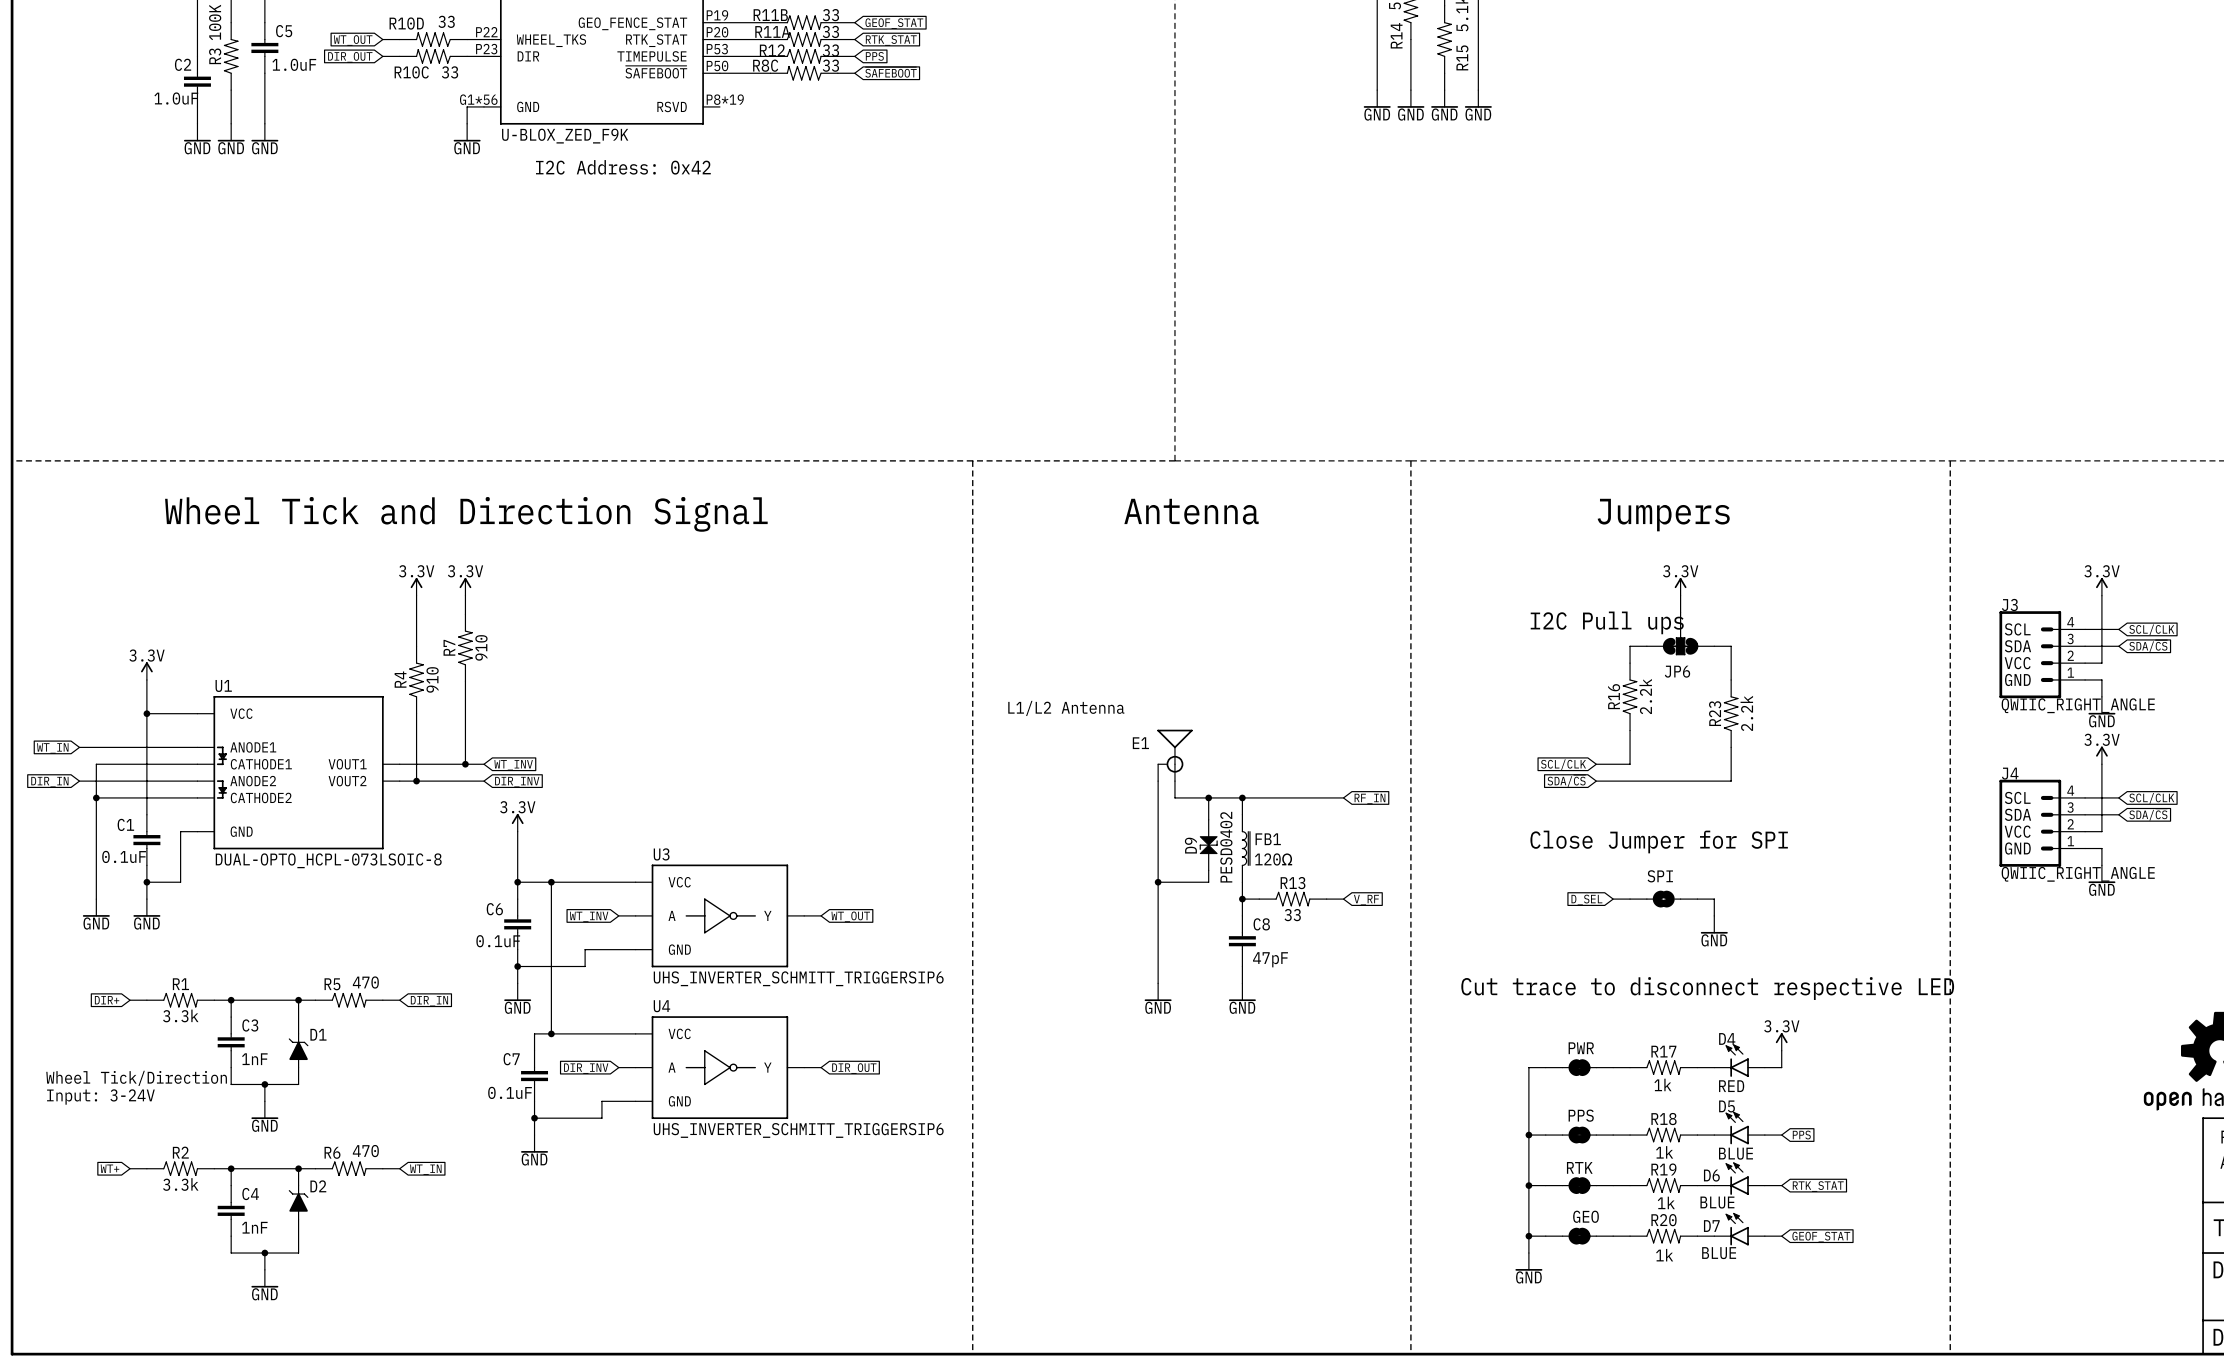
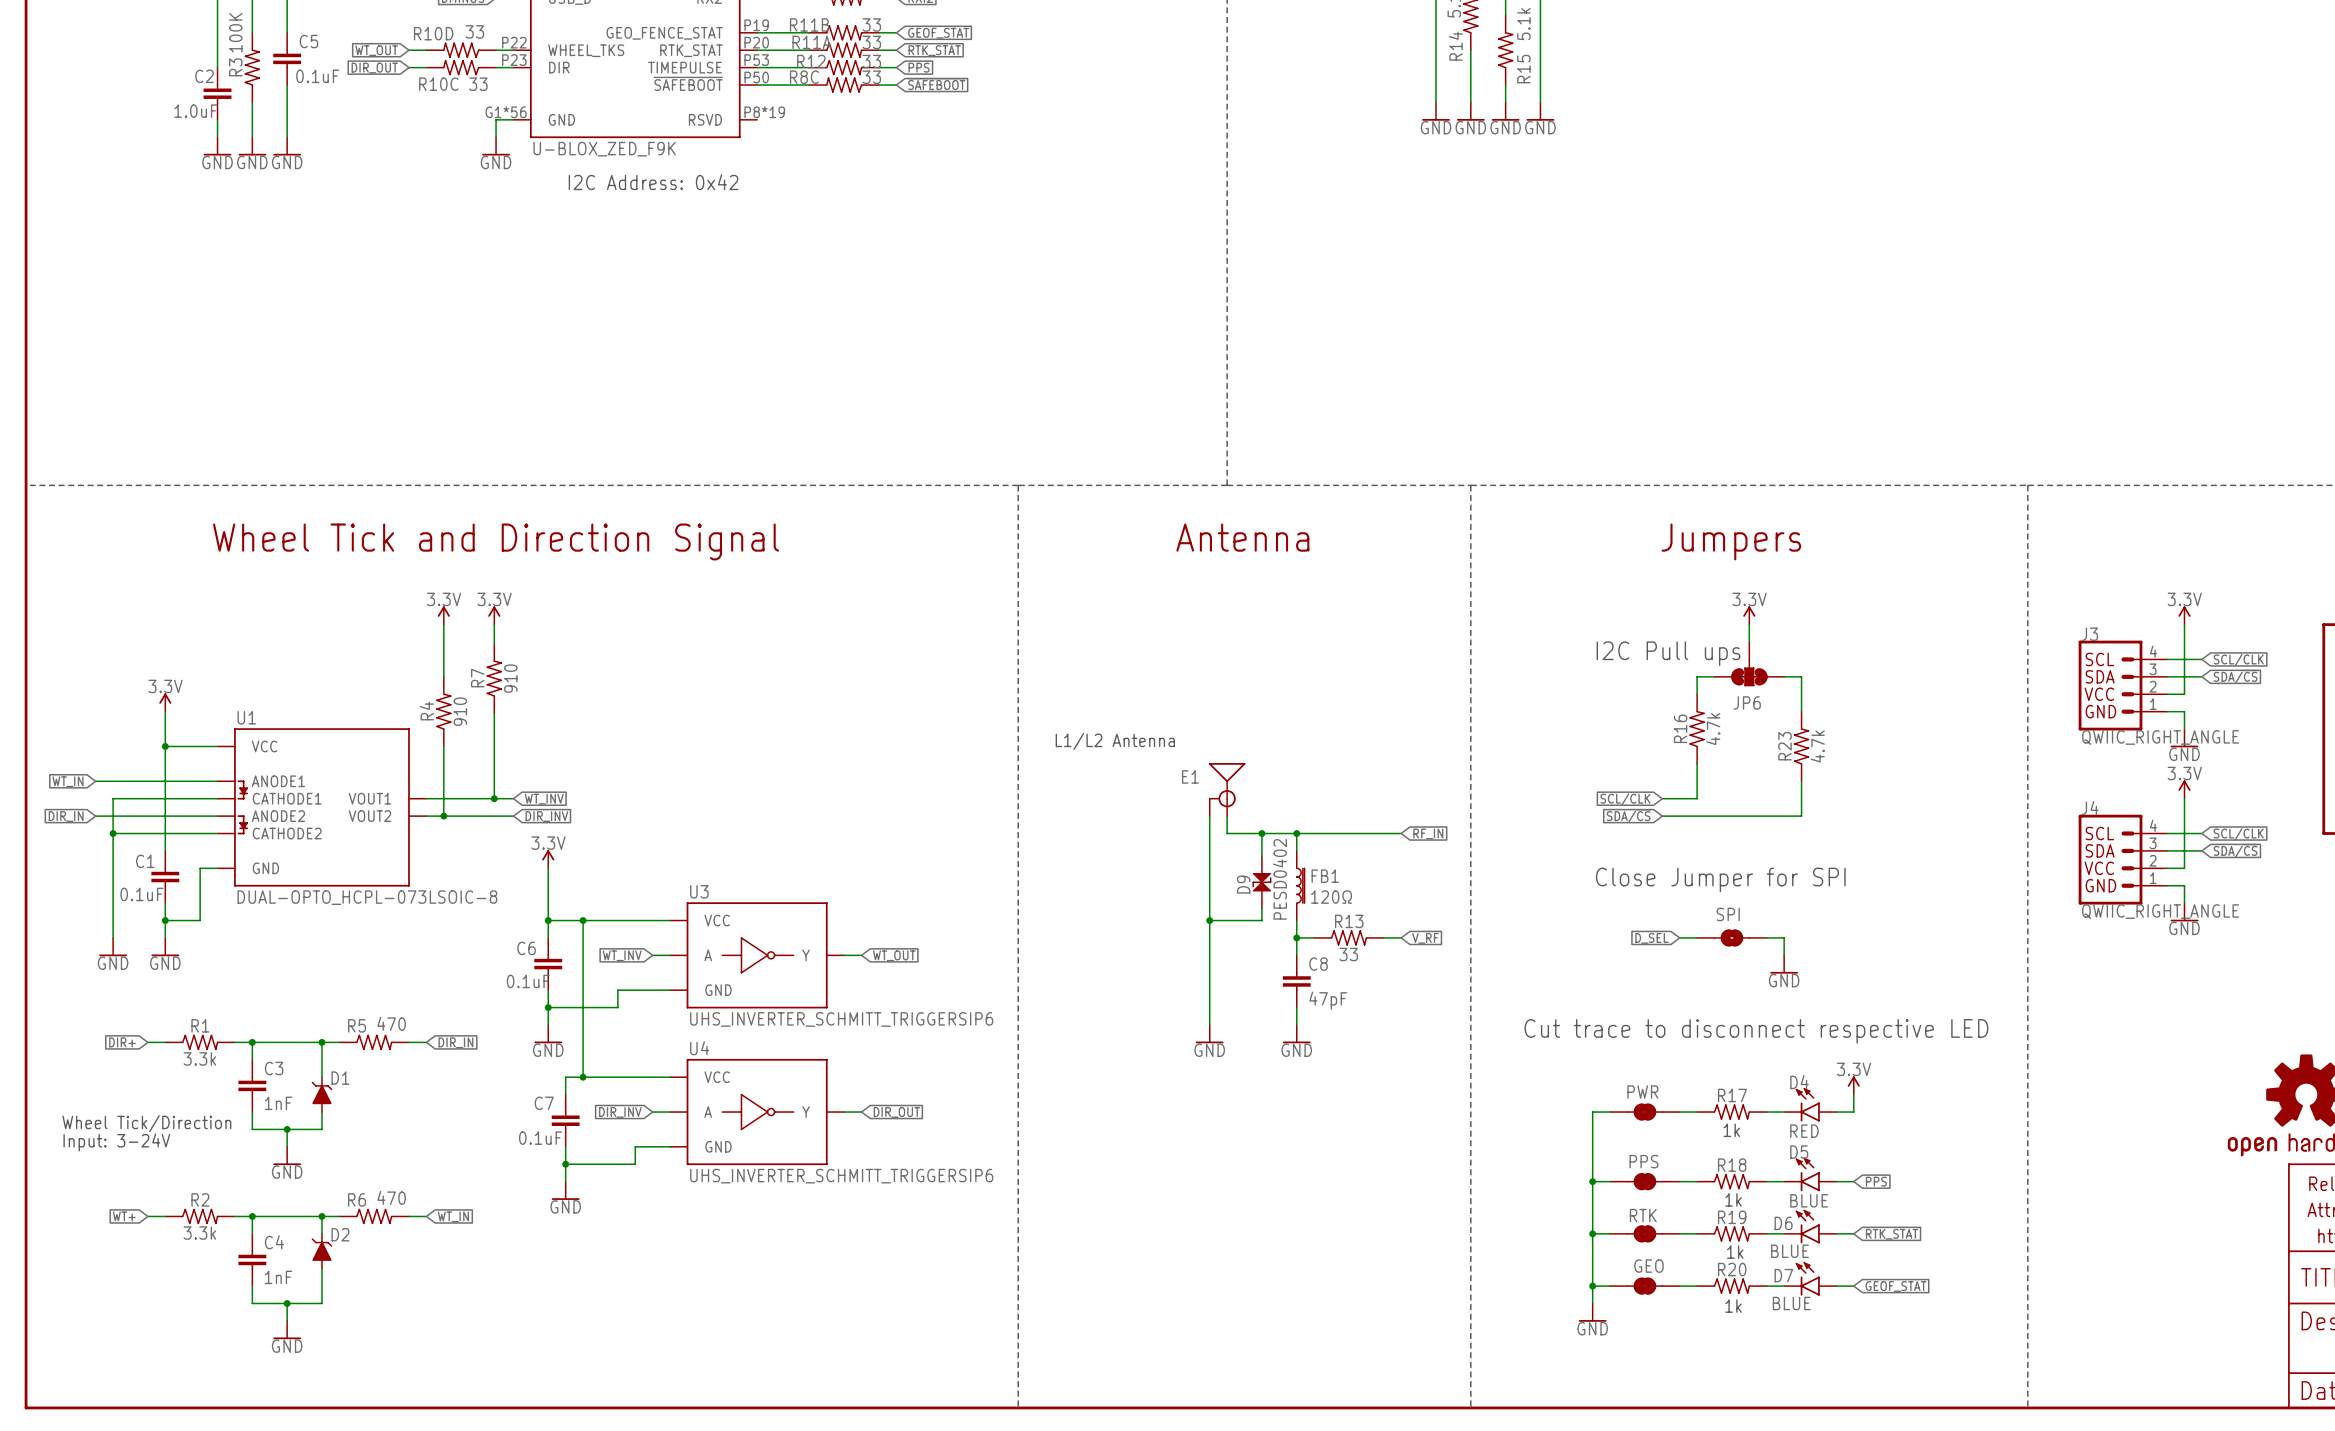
C5 value: 1.0uF (294, 64) -> 0.1uF (317, 76)
R16 value: 2.2k (1645, 696) -> 4.7k (1713, 729)
R23 value: 2.2k (1746, 713) -> 4.7k (1817, 746)

